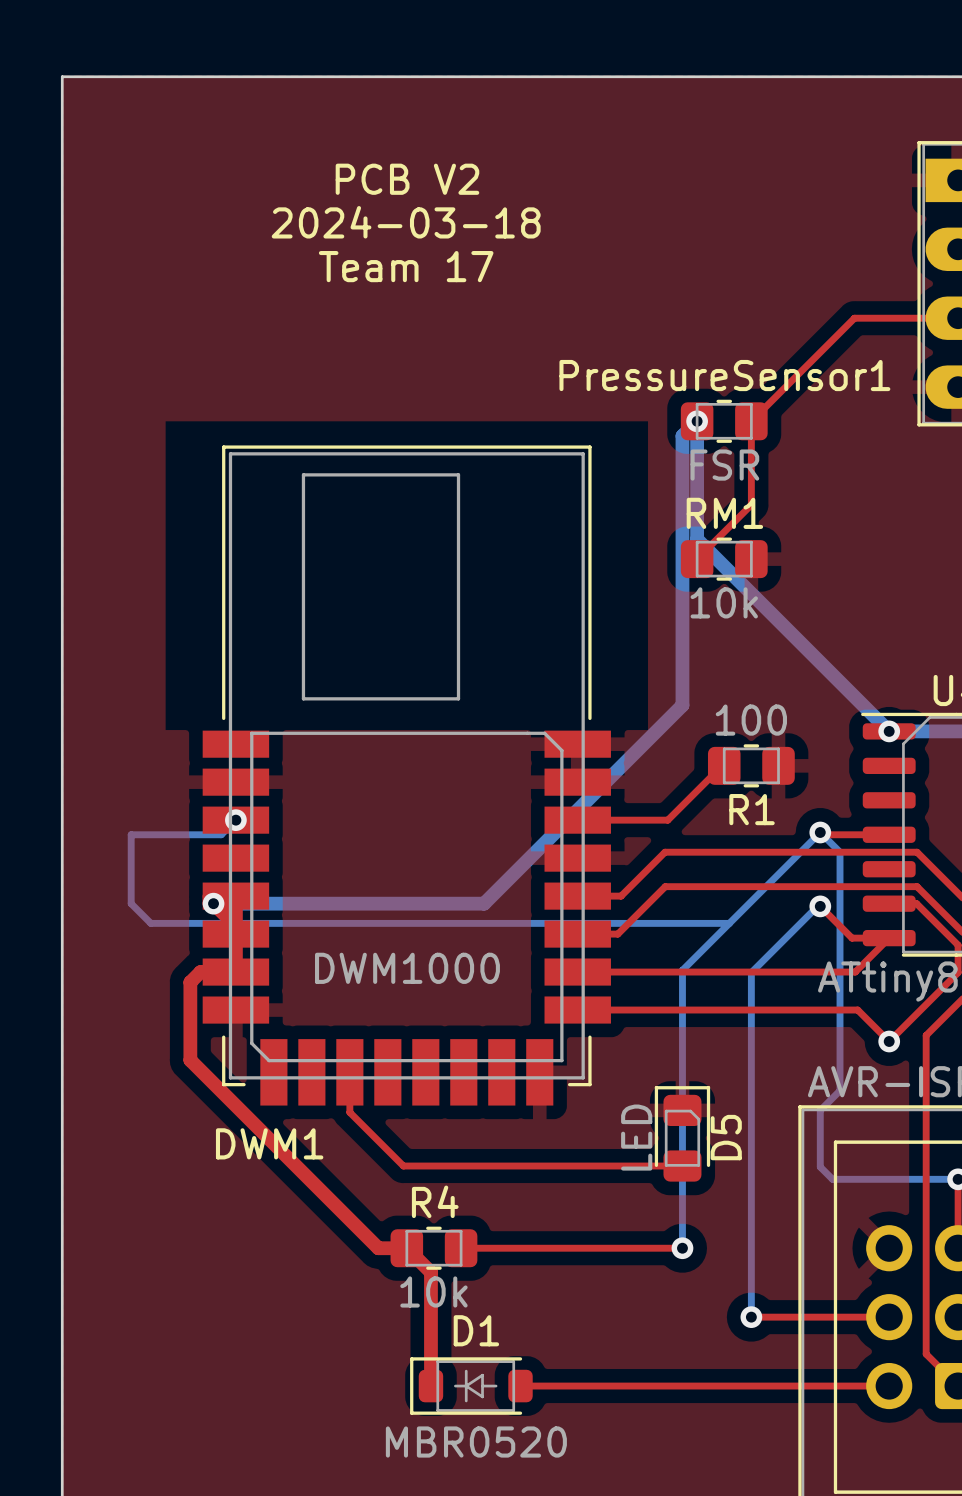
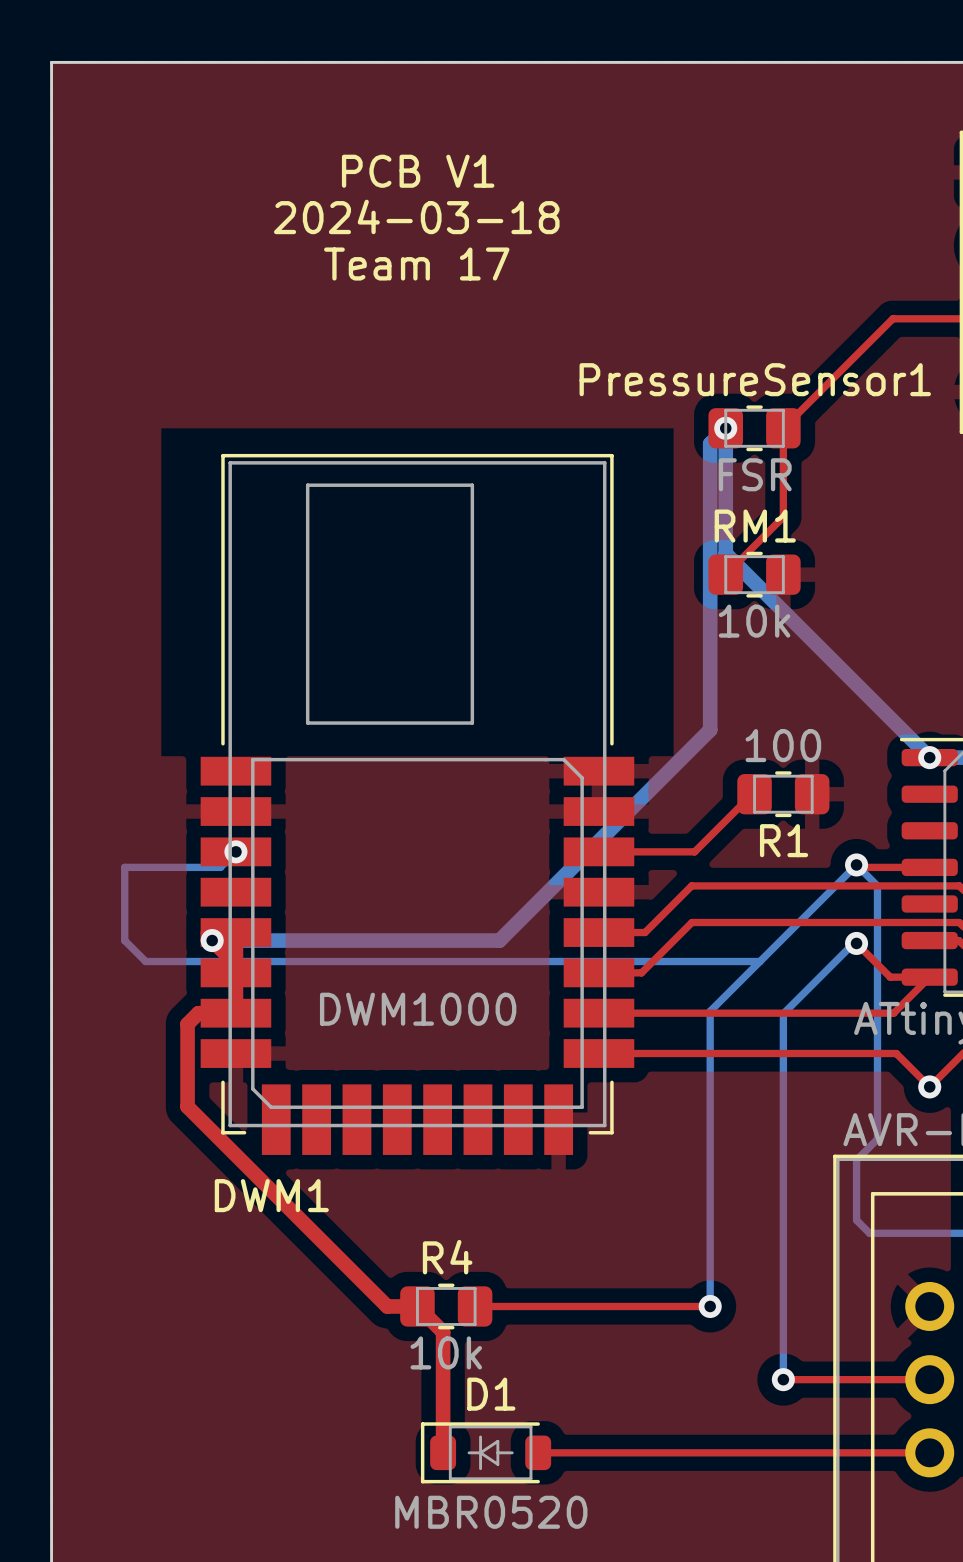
text: PCB V2 (407, 179) -> PCB V1 (418, 171)
top track: (349, 1072) (349, 1112) (403, 1166) (682, 1166) -> none
D5: LED (682, 1133) -> none

